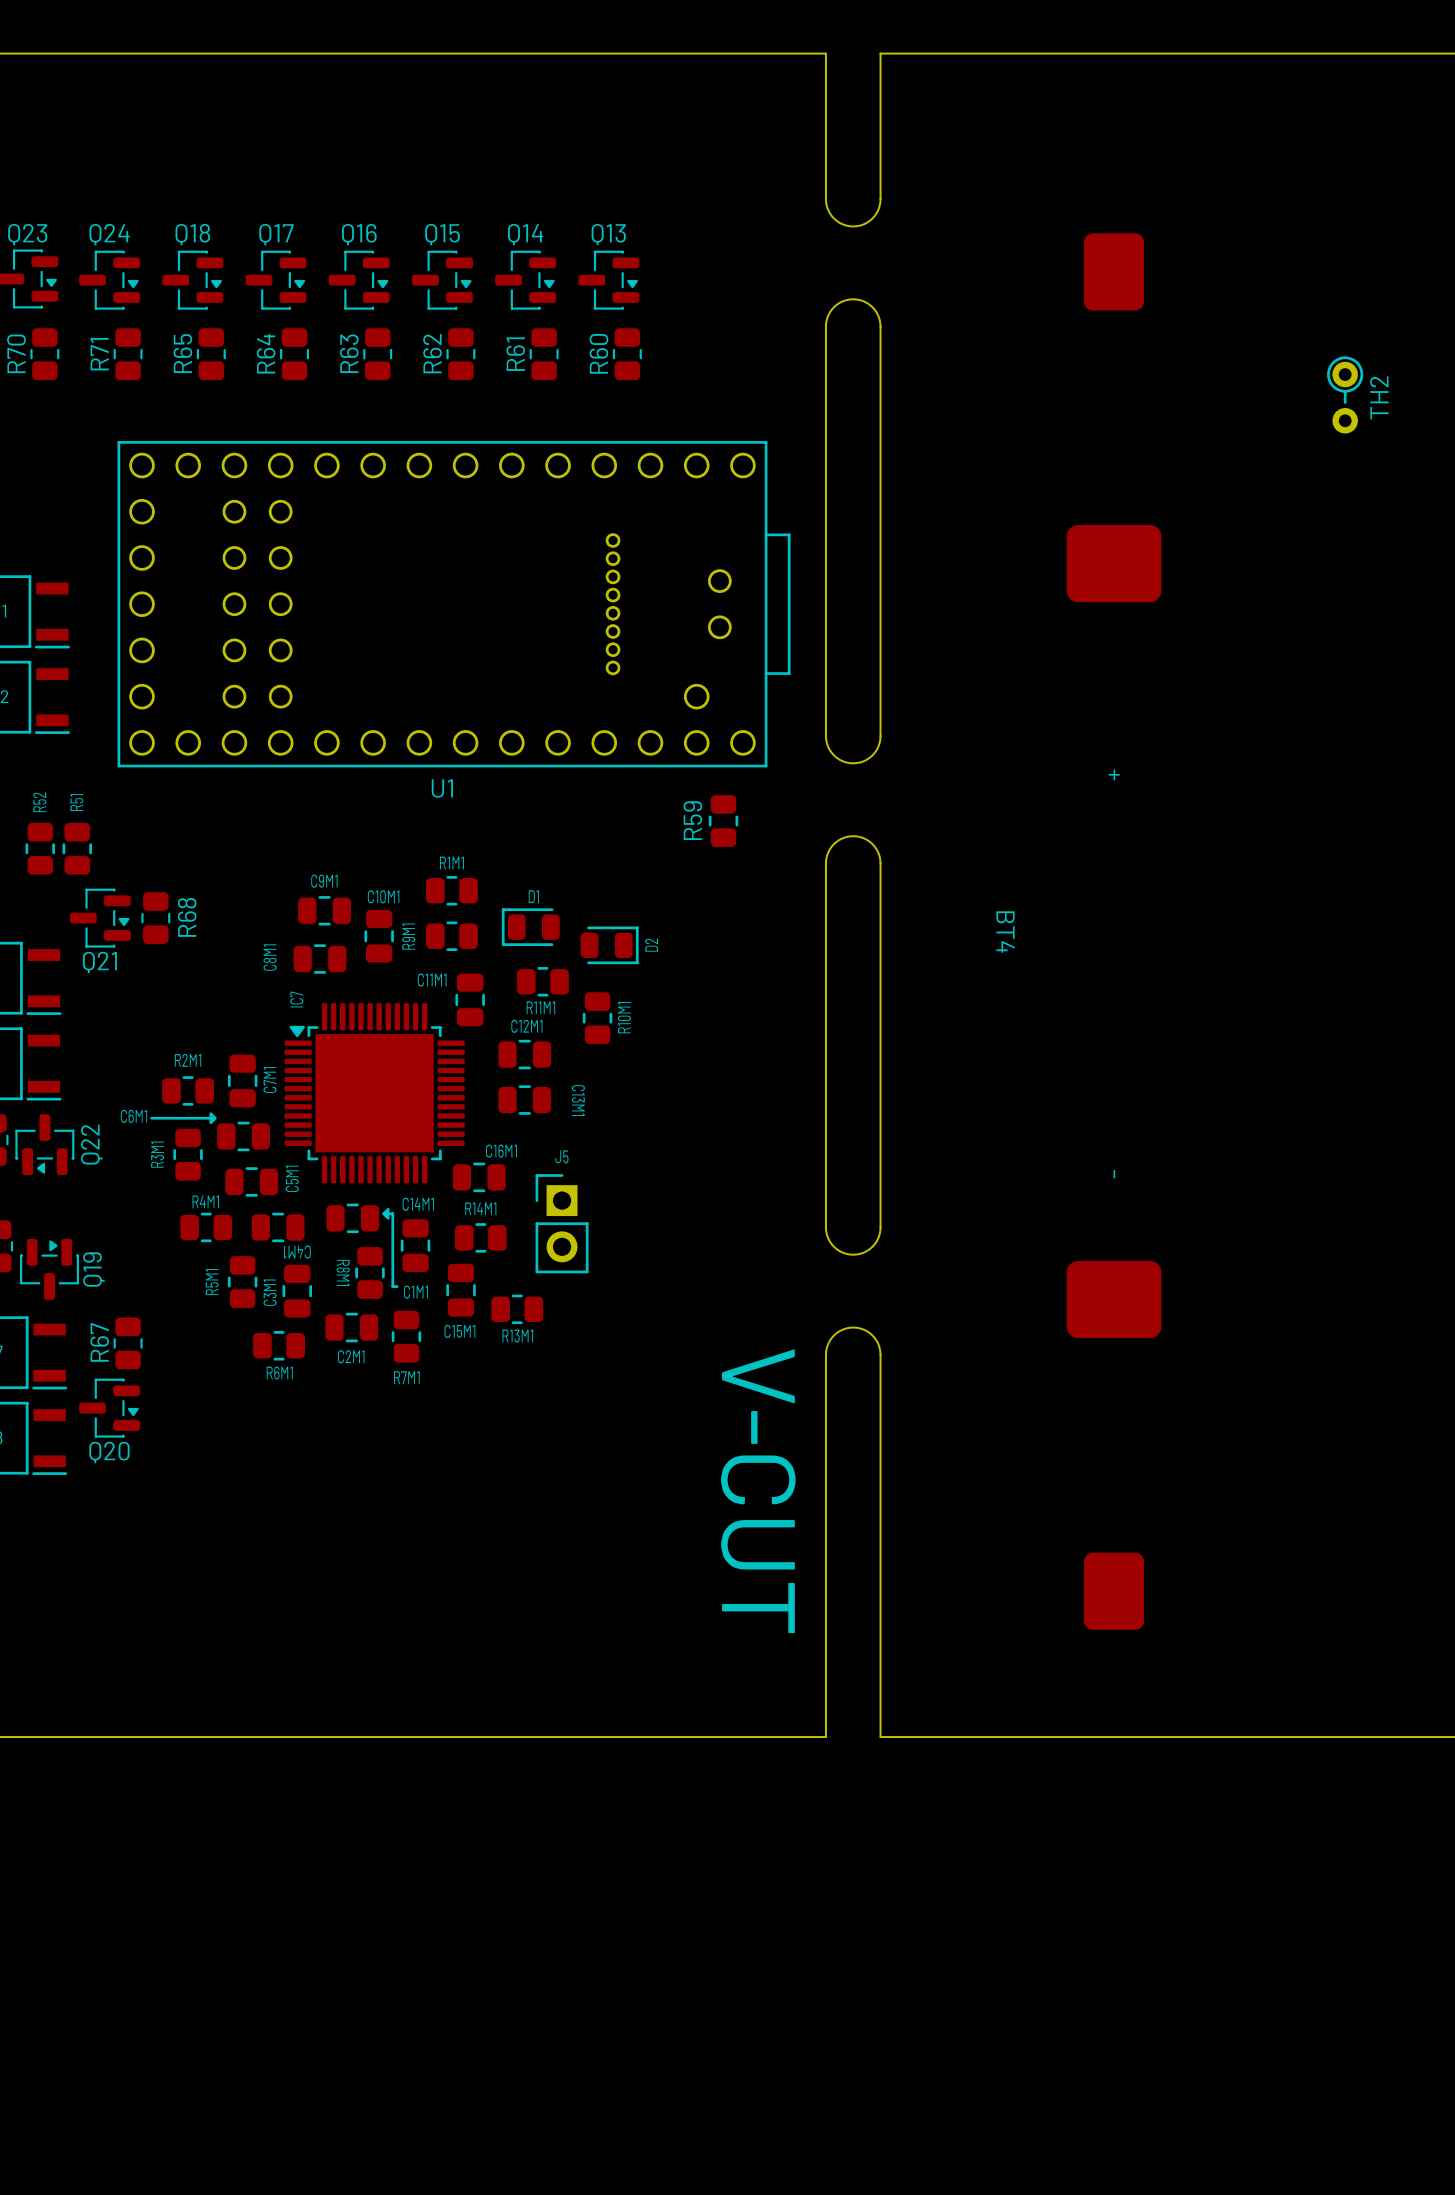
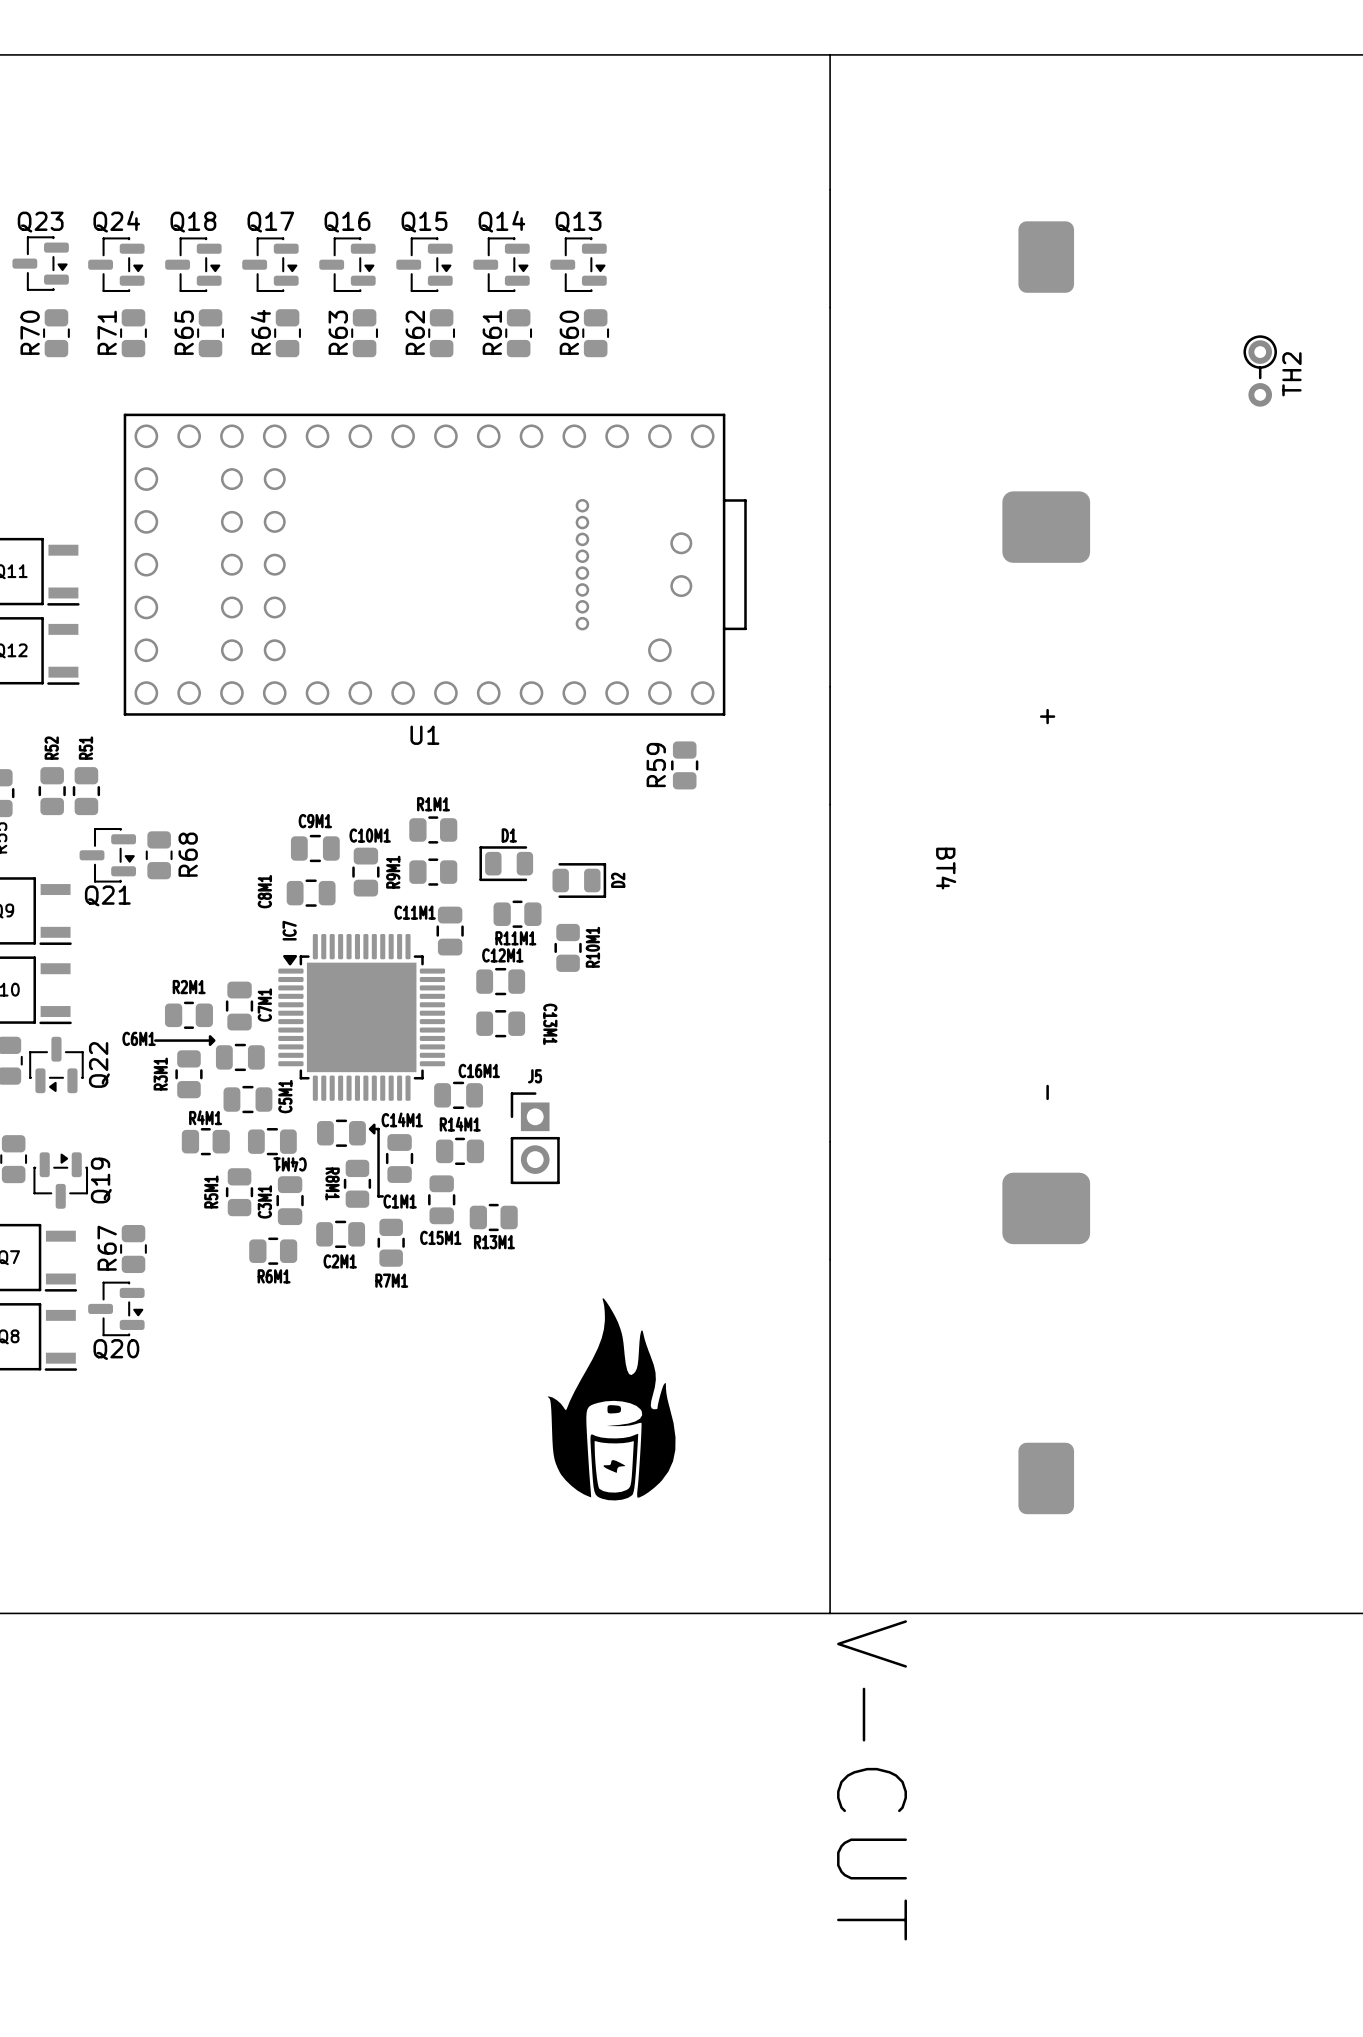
board edge: (825, 53) (825, 199) (828, 209) (839, 222) (856, 226) (872, 218) (878, 209) (880, 199) -> (779, 54) (830, 54)
board edge: (880, 326) (878, 316) (872, 307) (863, 301) (853, 299) (842, 301) (833, 307) (828, 316) (825, 326) (826, 739) (829, 749) (836, 757) (846, 762) (856, 763) (872, 755) (878, 746) (880, 736) -> (830, 307) (830, 189)
board edge: (880, 863) (878, 853) (872, 844) (863, 838) (853, 836) (842, 838) (833, 844) (828, 853) (825, 863) (826, 1231) (829, 1241) (836, 1249) (846, 1253) (856, 1254) (872, 1246) (878, 1237) (880, 1227) -> (830, 804) (830, 686)
board edge: none -> (830, 1141) (830, 1259)
board edge: (880, 1354) (878, 1344) (872, 1335) (856, 1327) (846, 1328) (836, 1333) (829, 1341) (826, 1351) (825, 1737) -> (830, 1613) (779, 1613)
drawing: none -> [547, 1298, 676, 1501]
text position: V-CUT (758, 1491) -> V-CUT (872, 1780)

